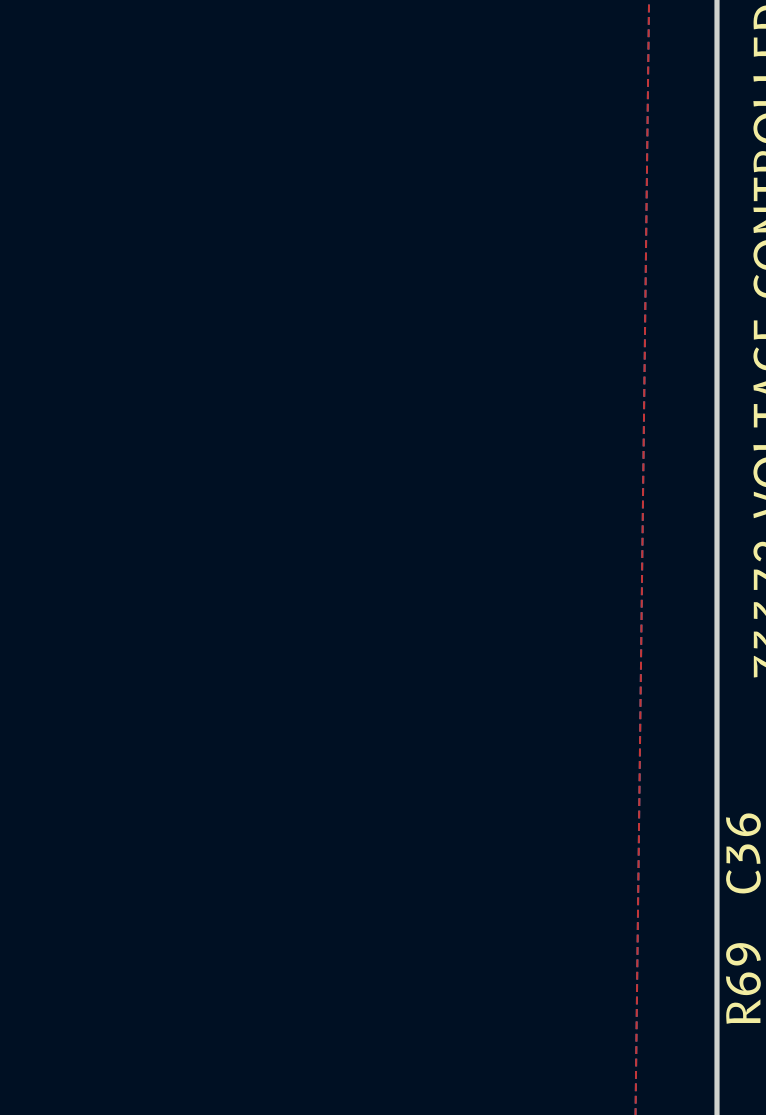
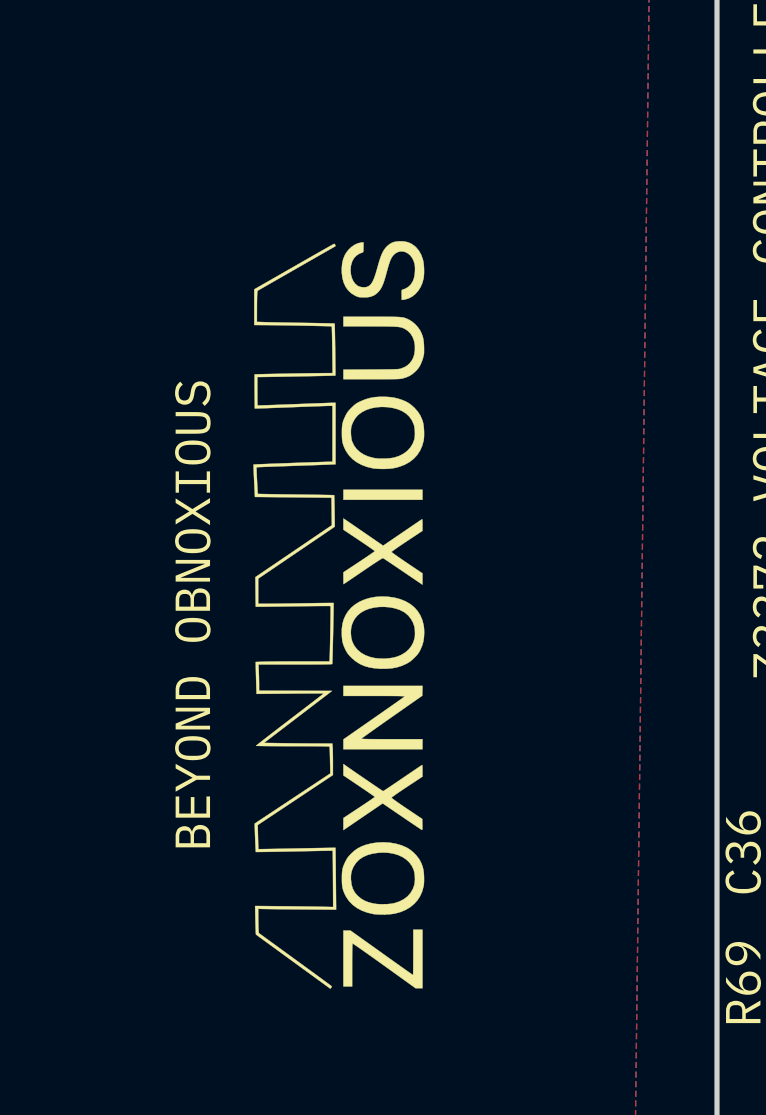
drawing: none -> [253, 241, 425, 989]
text: none -> BEYOND OBNOXIOUS (192, 614)

